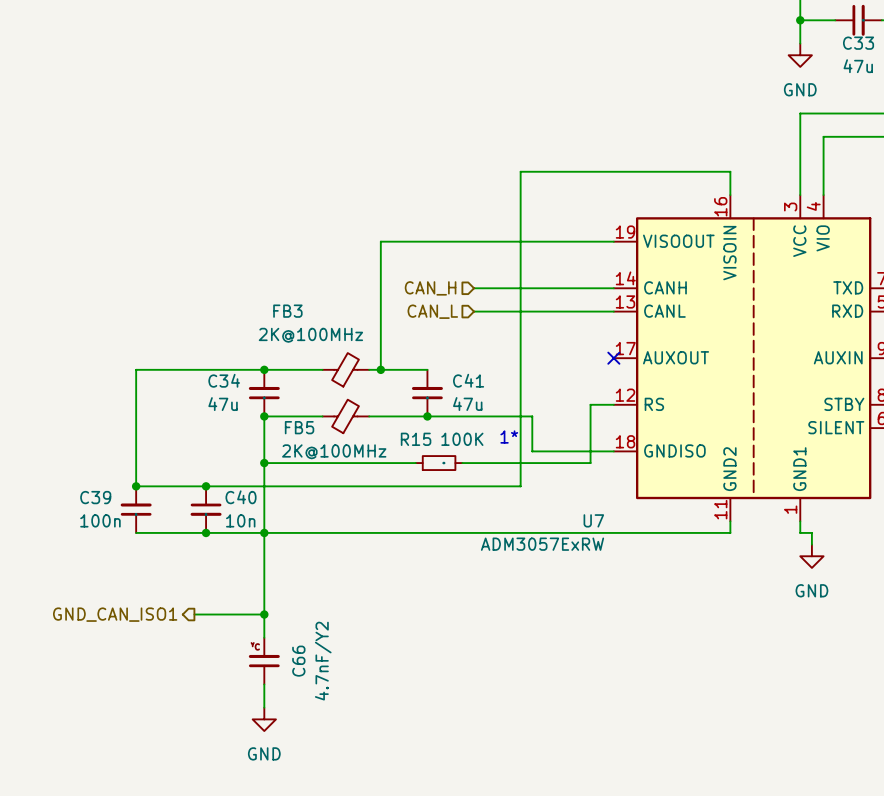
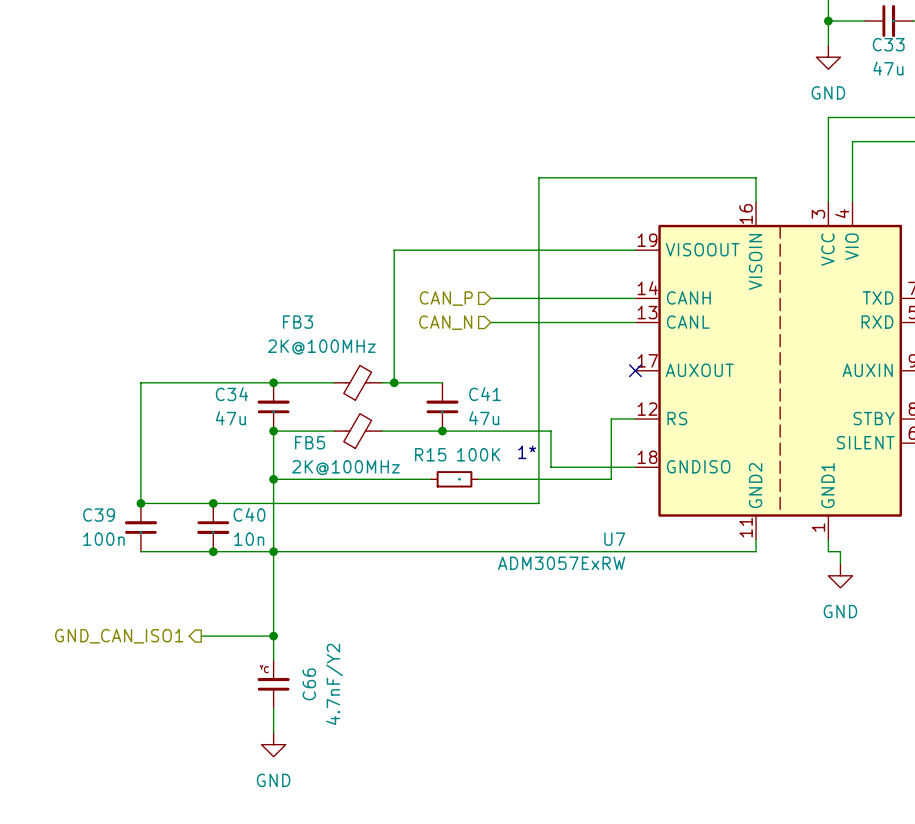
hierarchical label: CAN_H (430, 288) -> CAN_P (446, 298)
hierarchical label: CAN_L (432, 311) -> CAN_N (445, 322)

